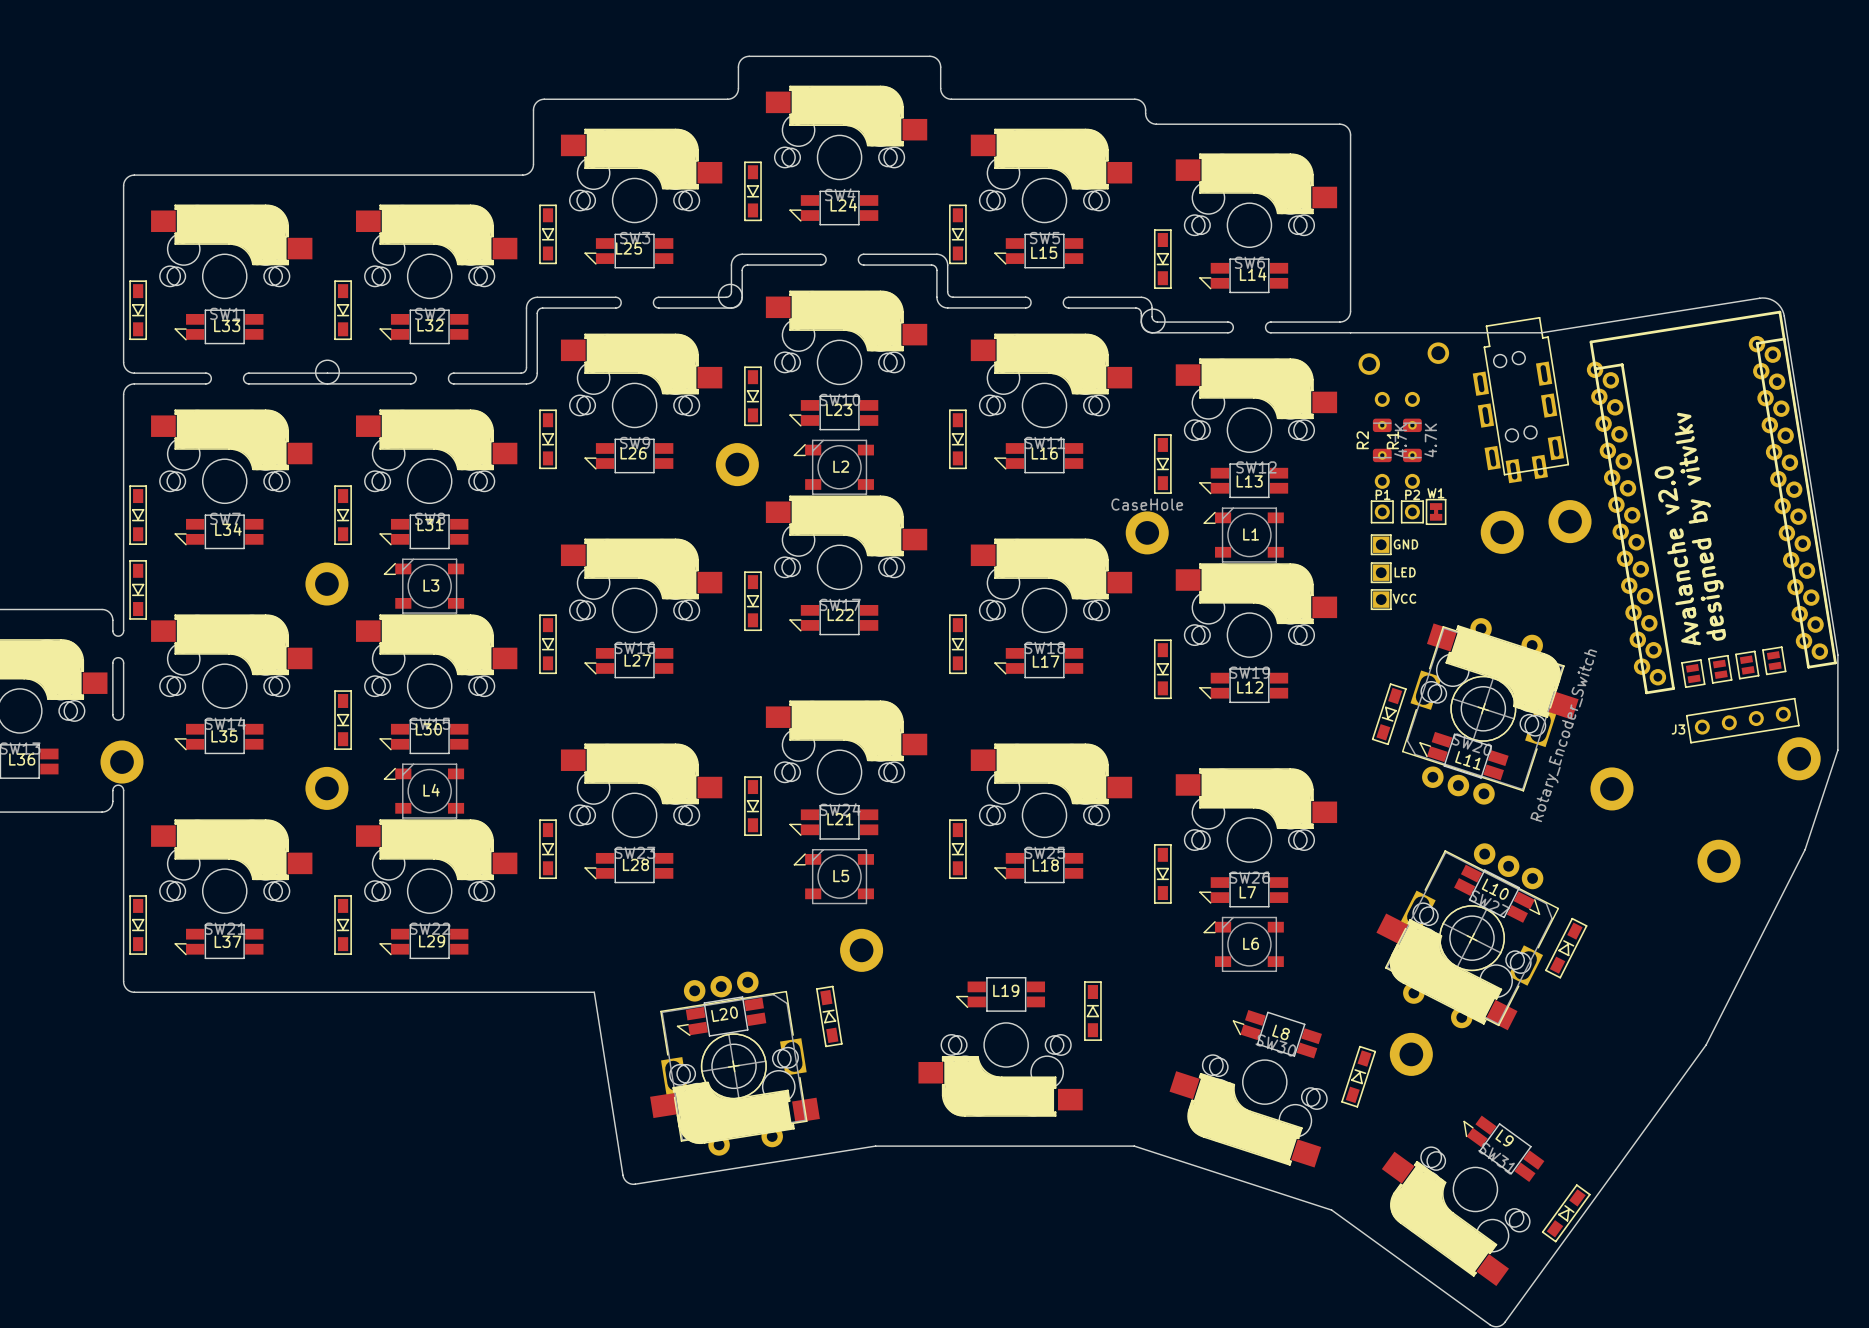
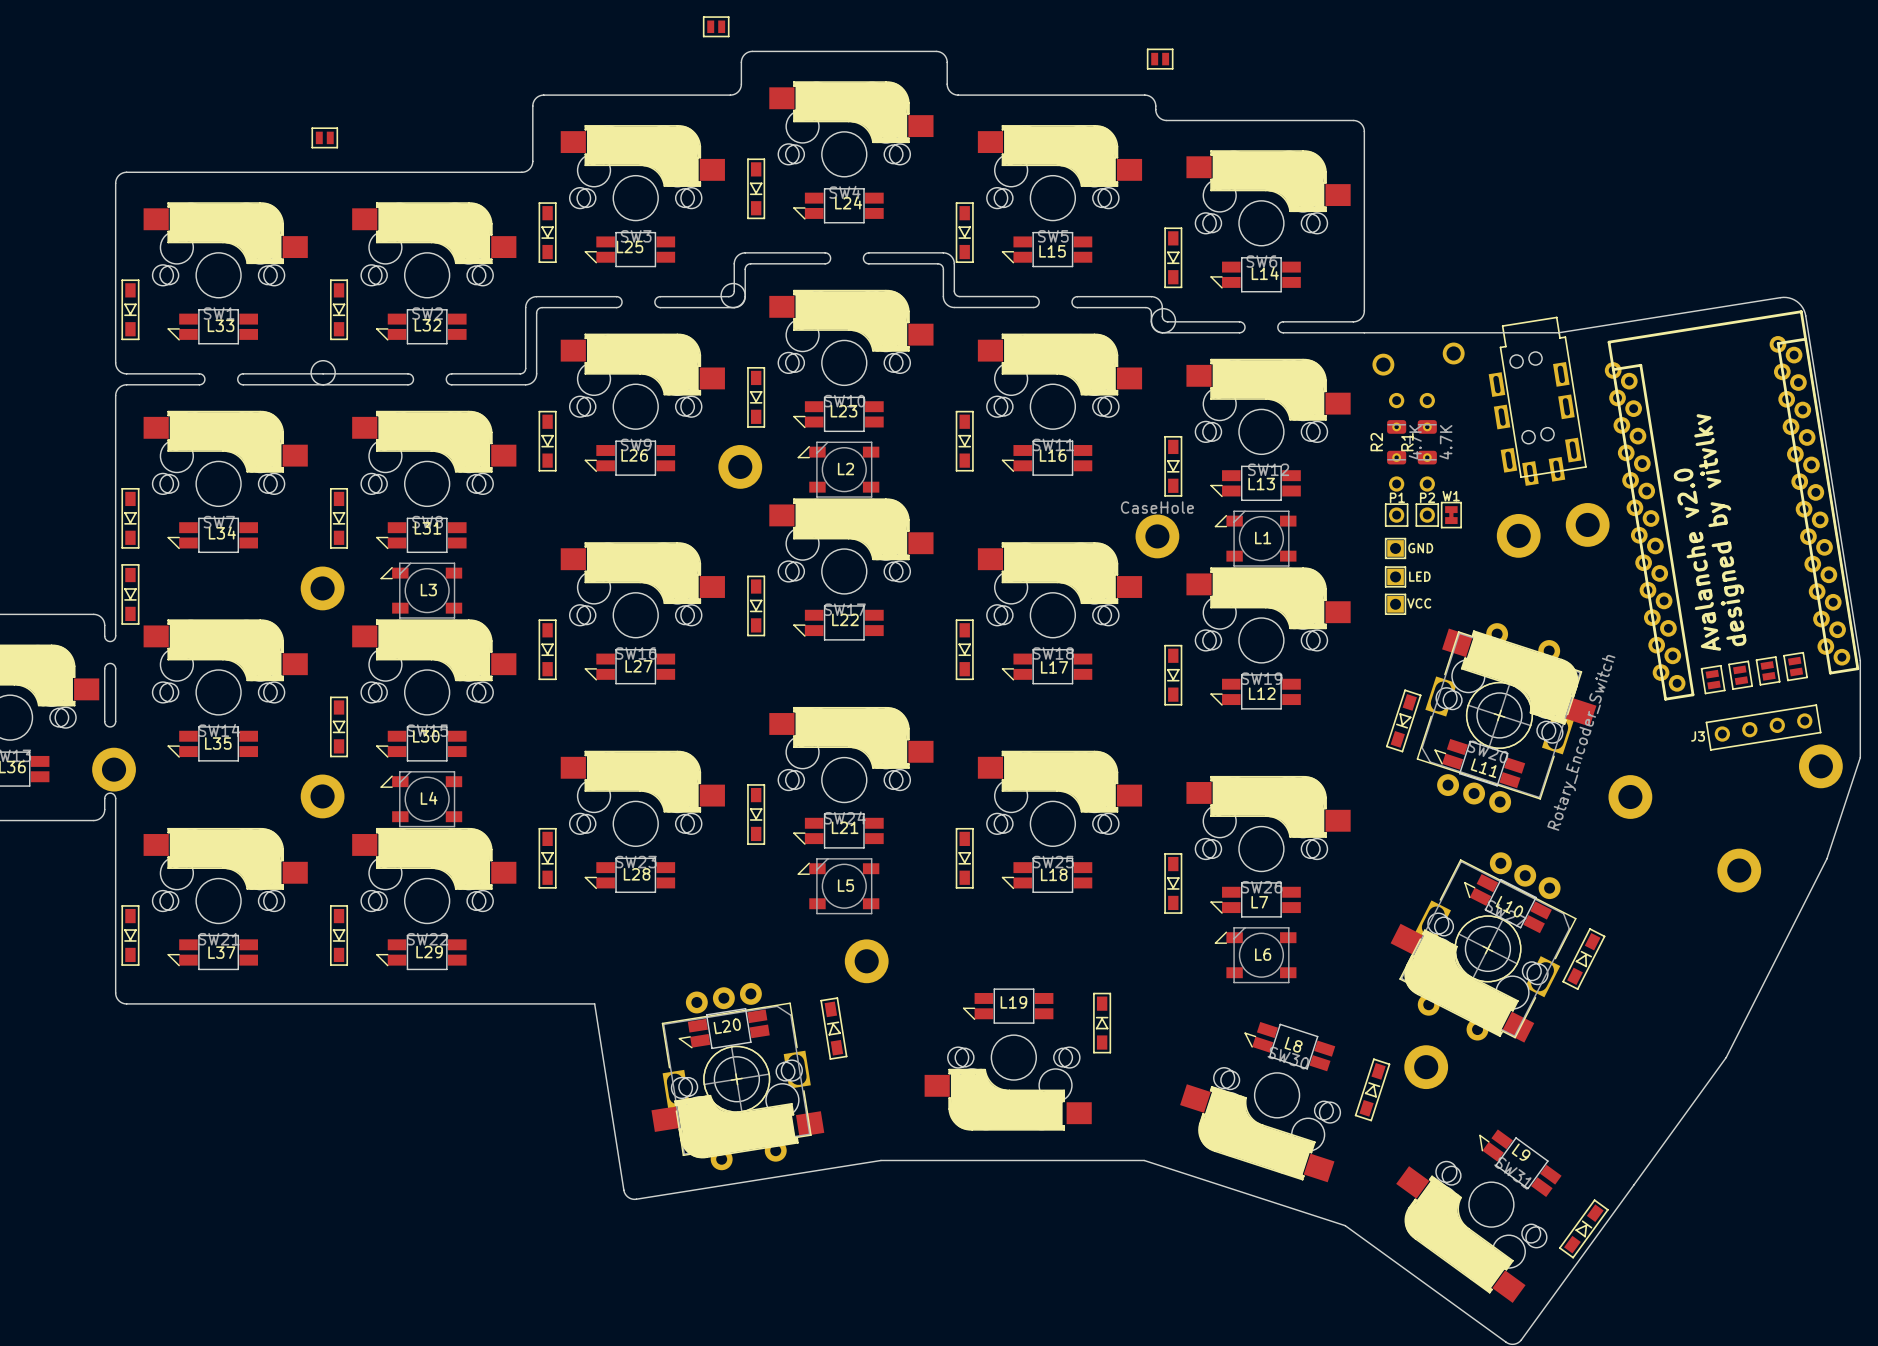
part: none -> (716, 26)
part: none -> (1160, 59)
part: none -> (324, 137)
L10 rotation: 0° (1497, 893) -> 180° (1508, 903)

